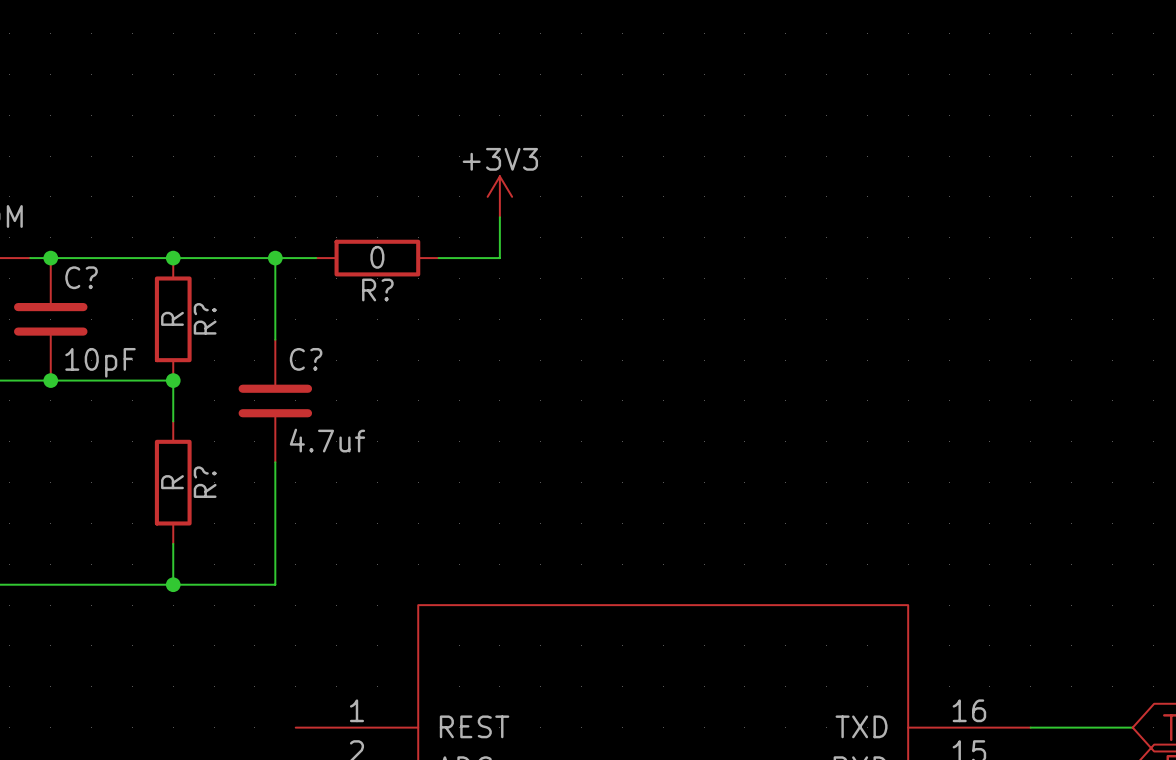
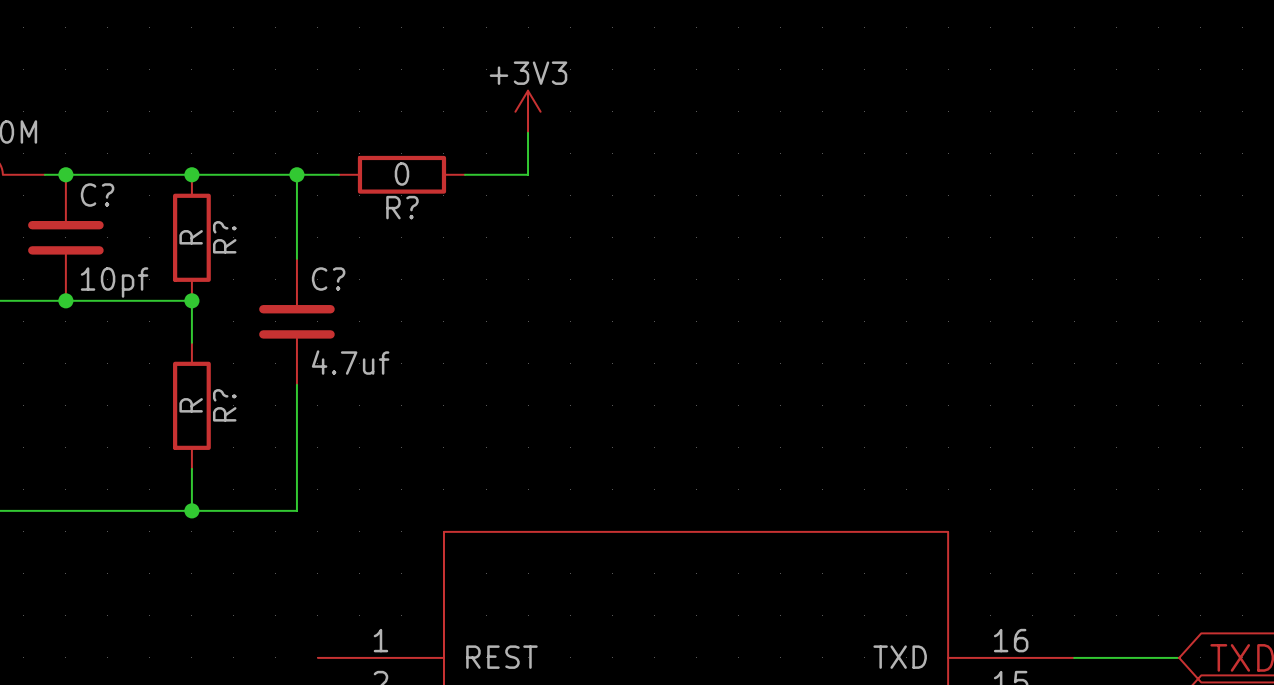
C? value: 10pF (100, 362) -> 10pf (114, 282)

